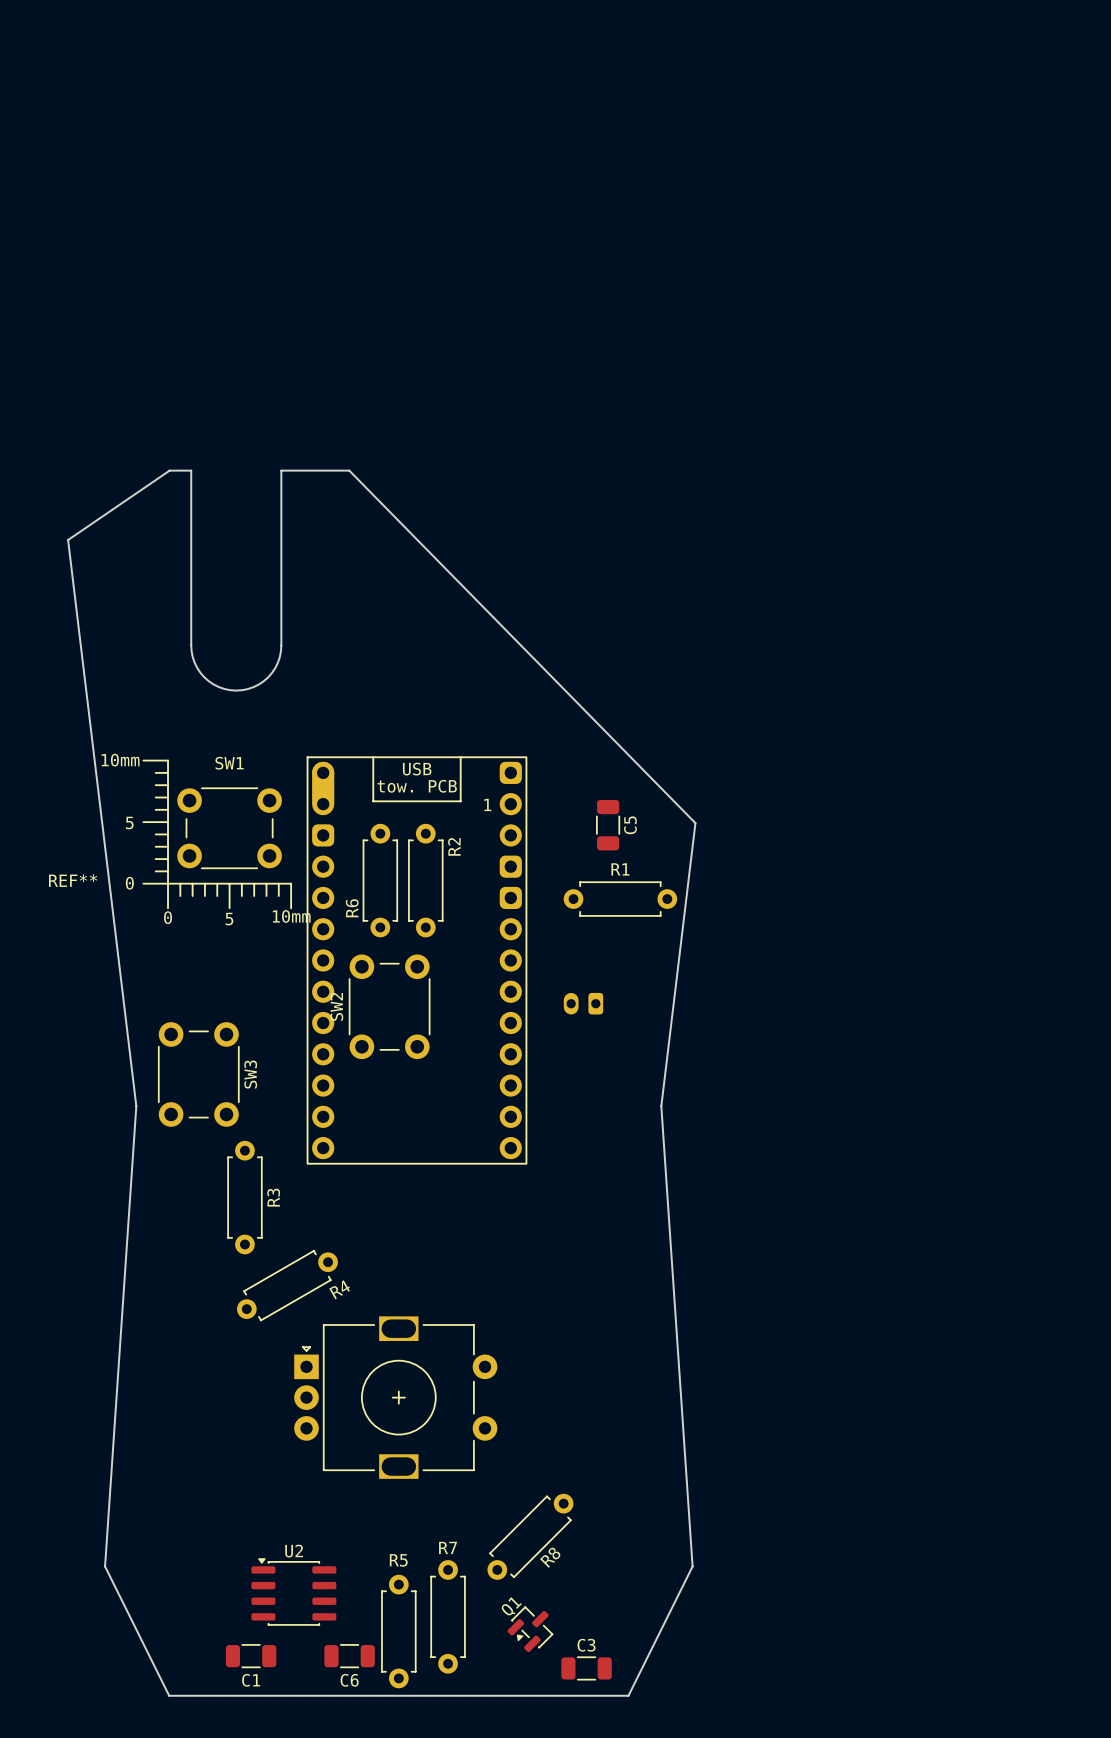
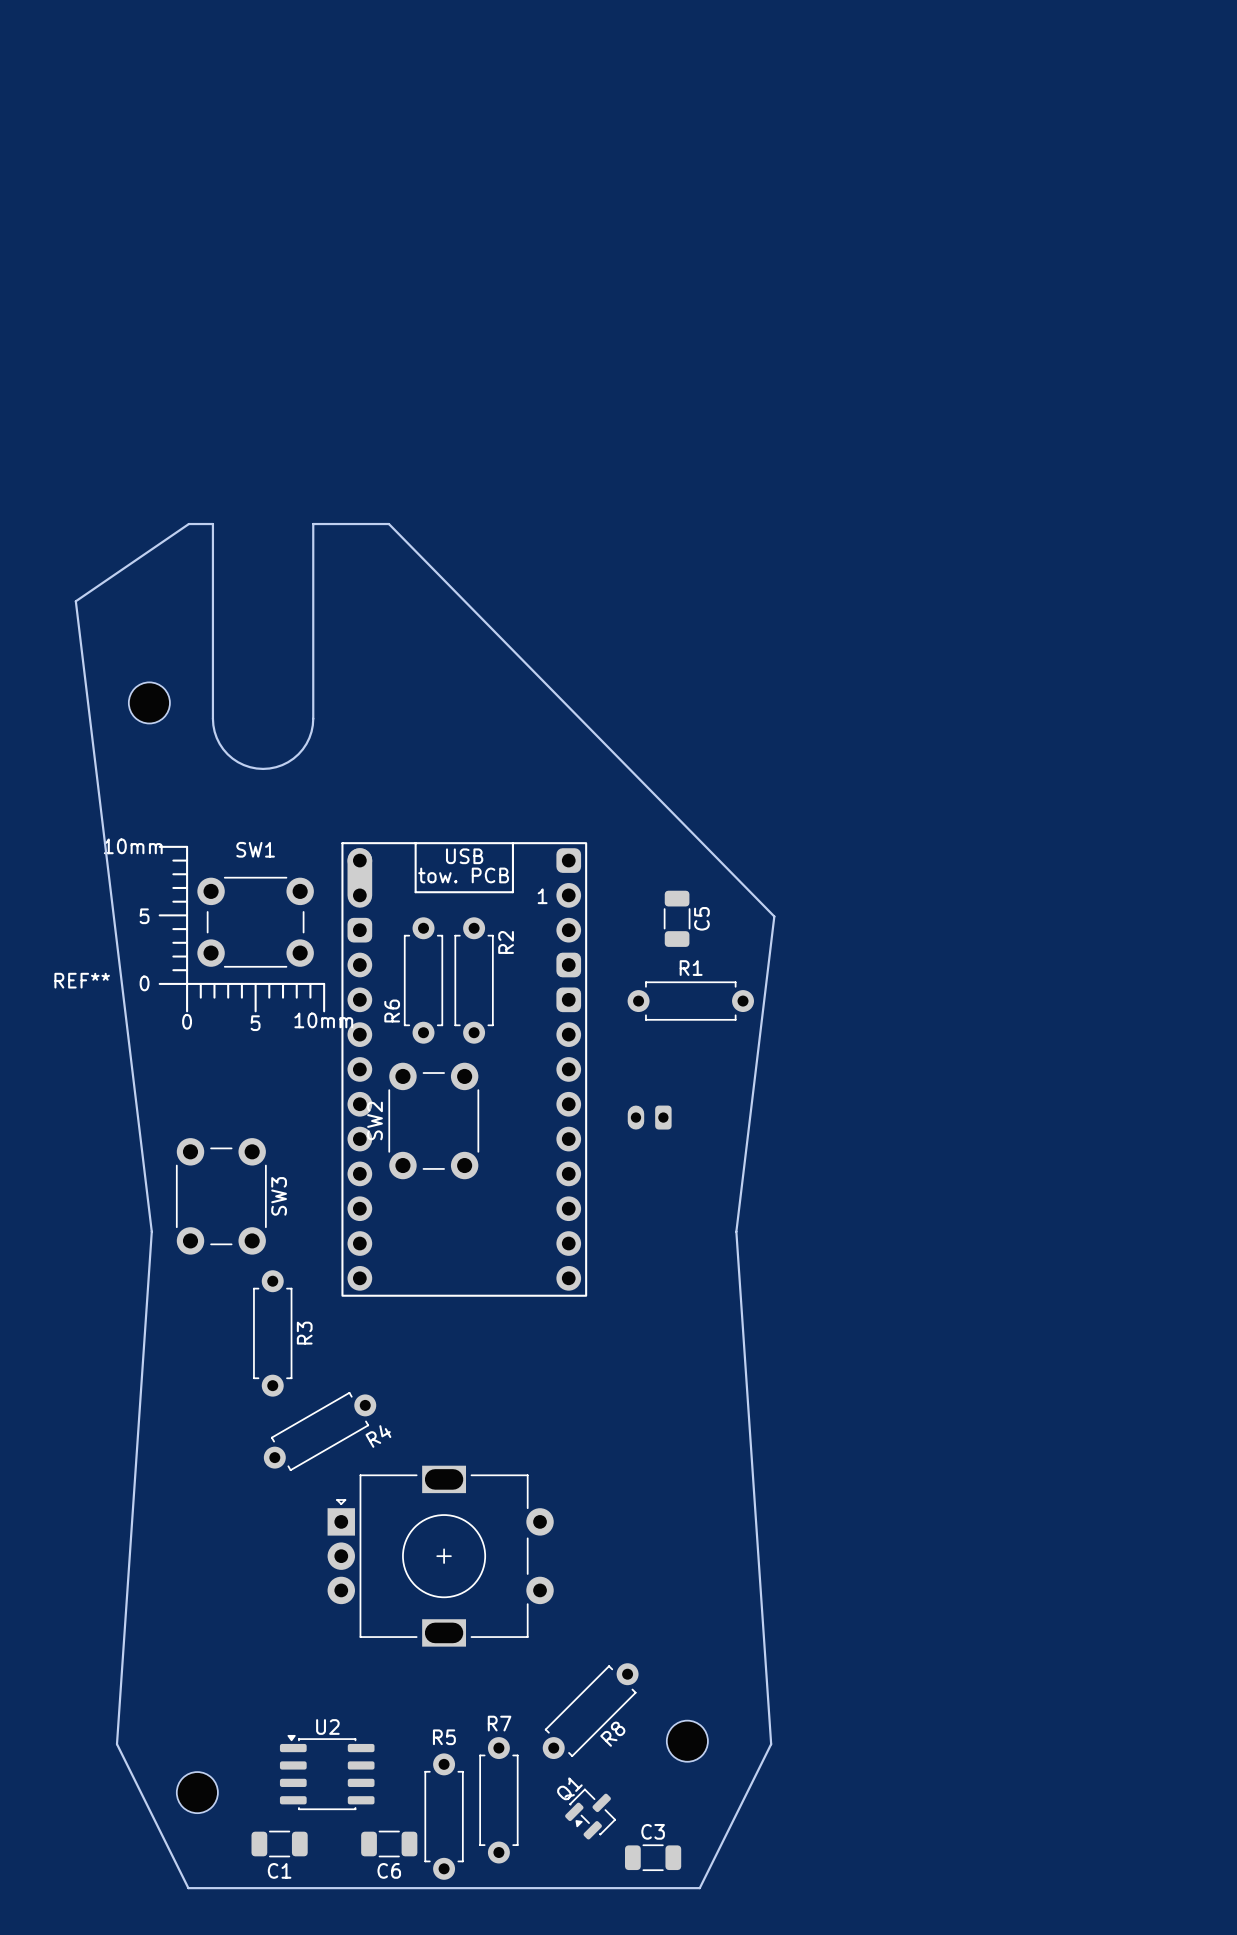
part: none -> (149, 702)
part: none -> (687, 1741)
part: none -> (197, 1792)

